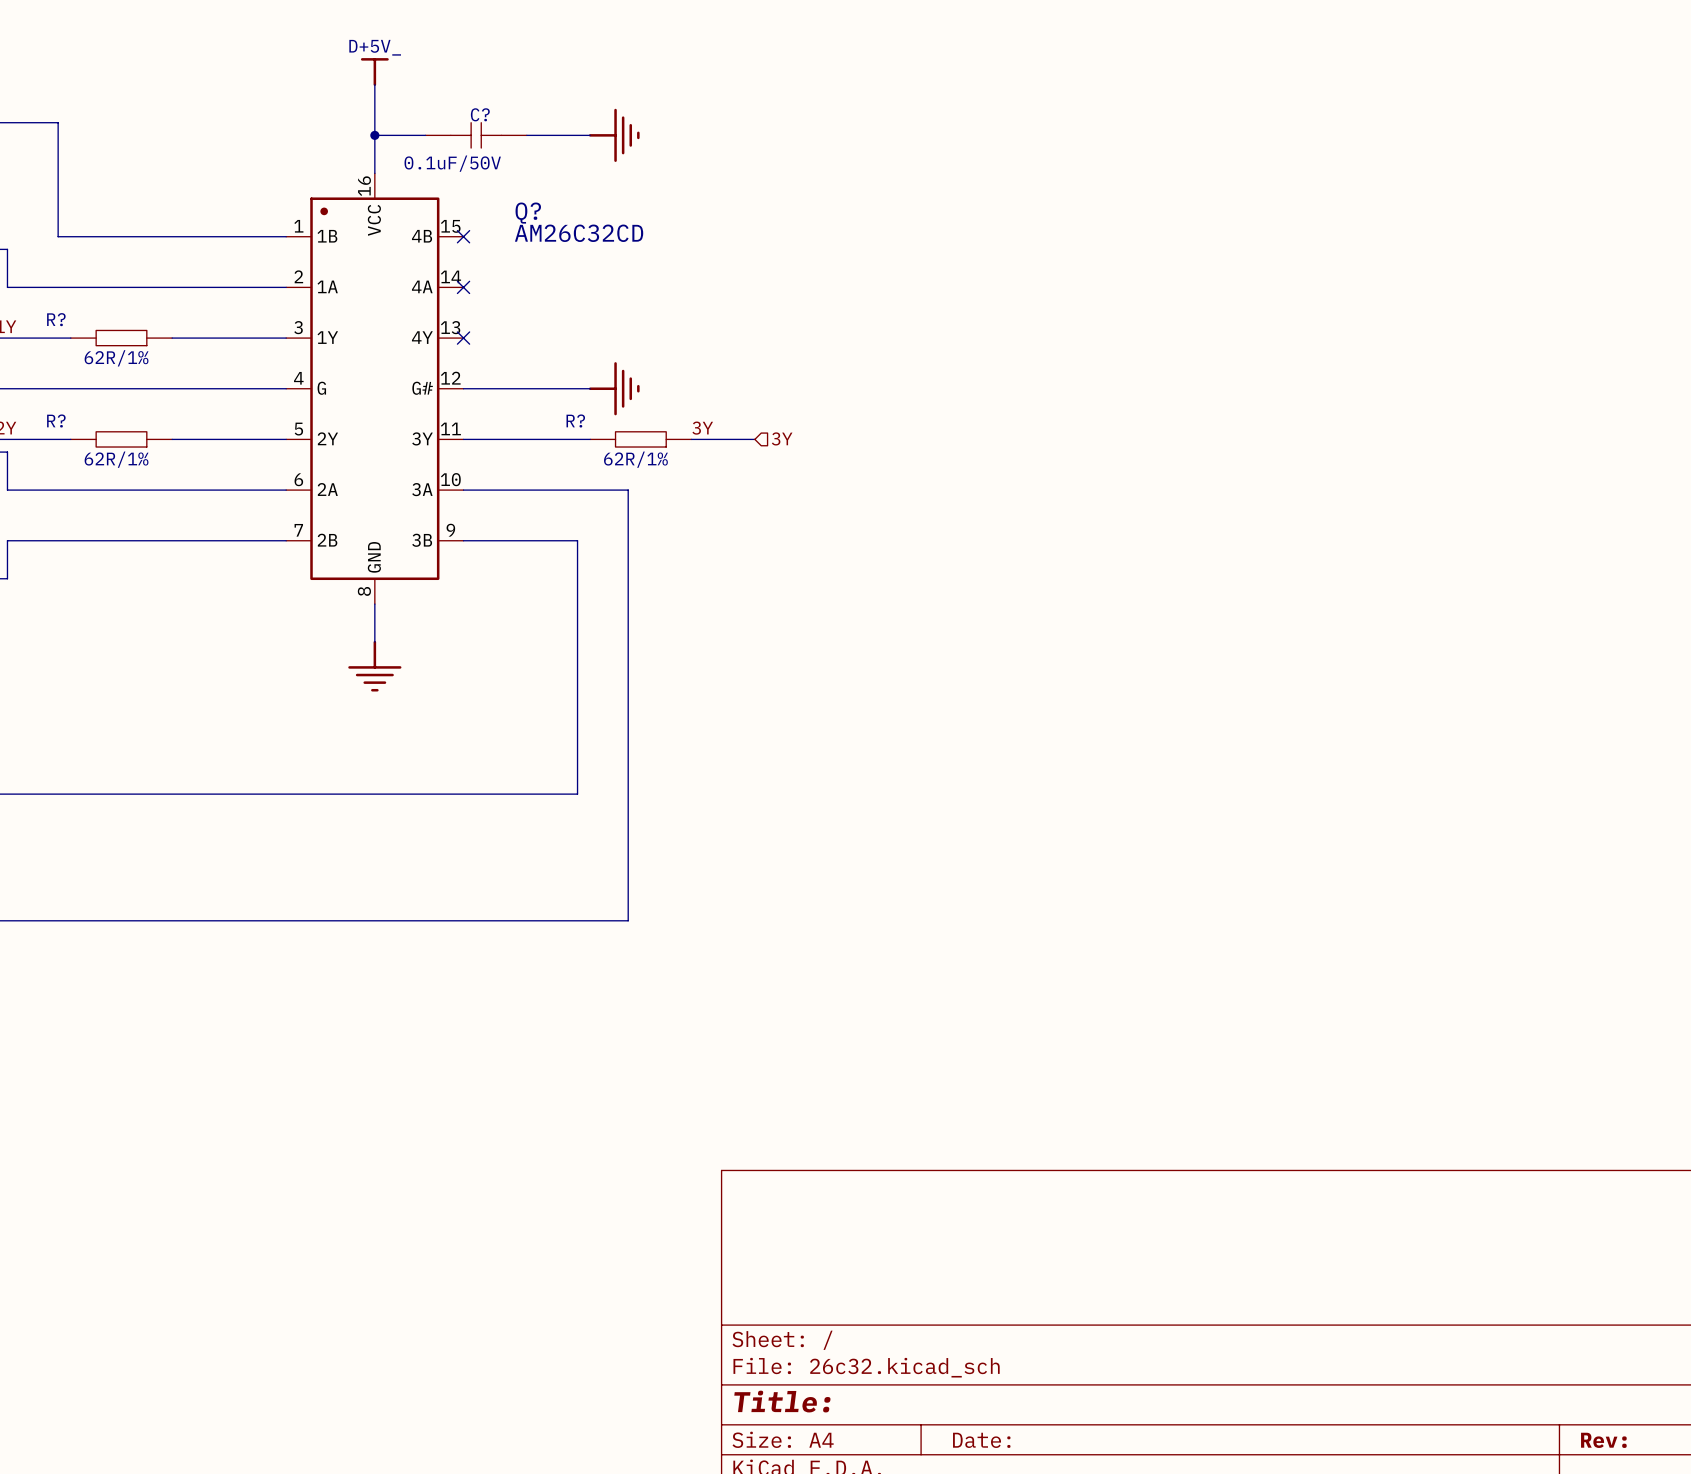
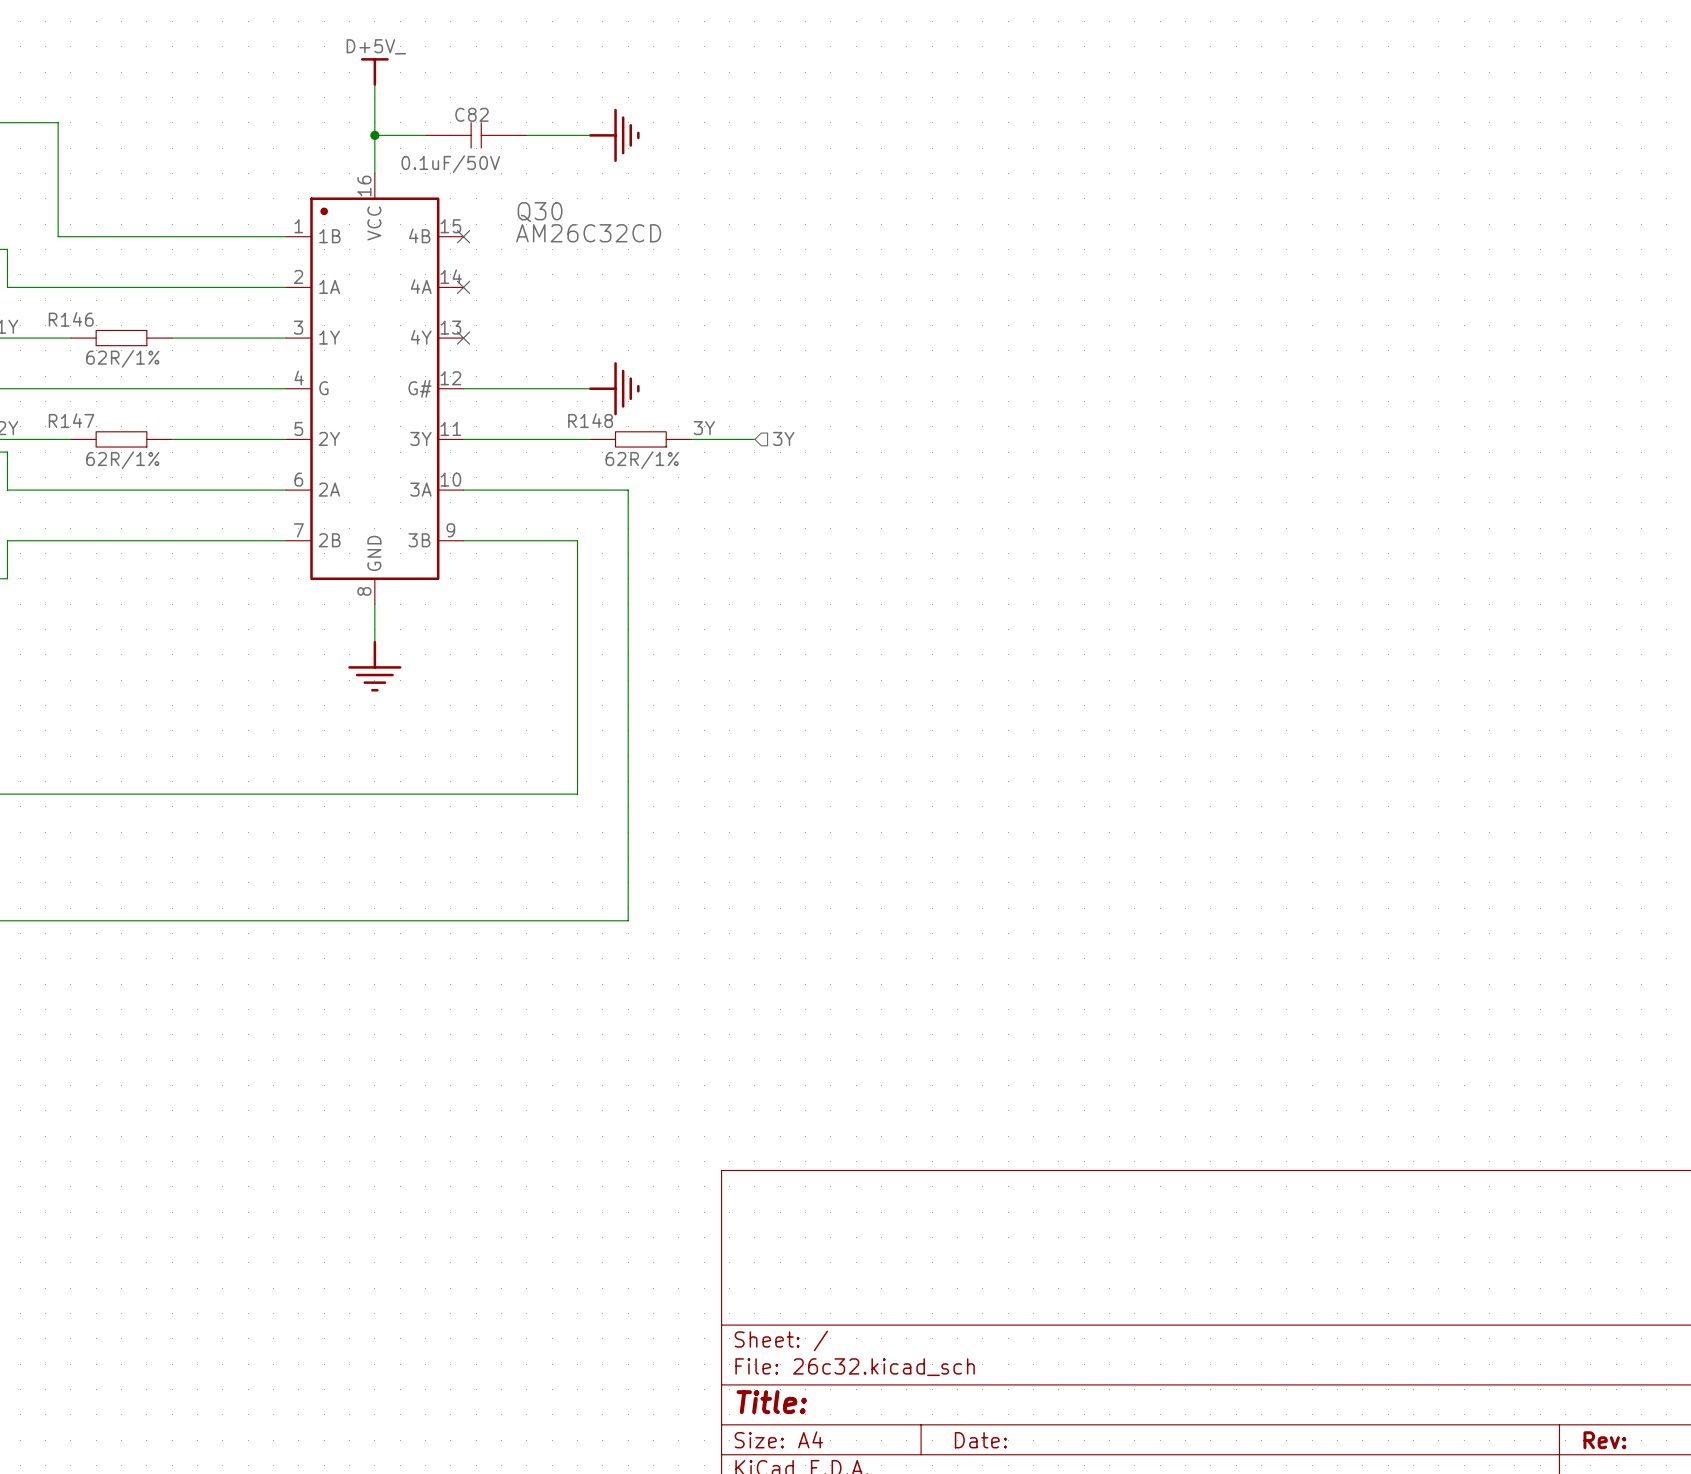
C? name: C? (480, 114) -> C82 (471, 114)
Q? name: Q? (528, 213) -> Q30 (540, 212)
R? name: R? (56, 319) -> R146 (71, 319)
R? name: R? (56, 420) -> R147 (71, 420)
R? name: R? (575, 420) -> R148 (590, 420)

